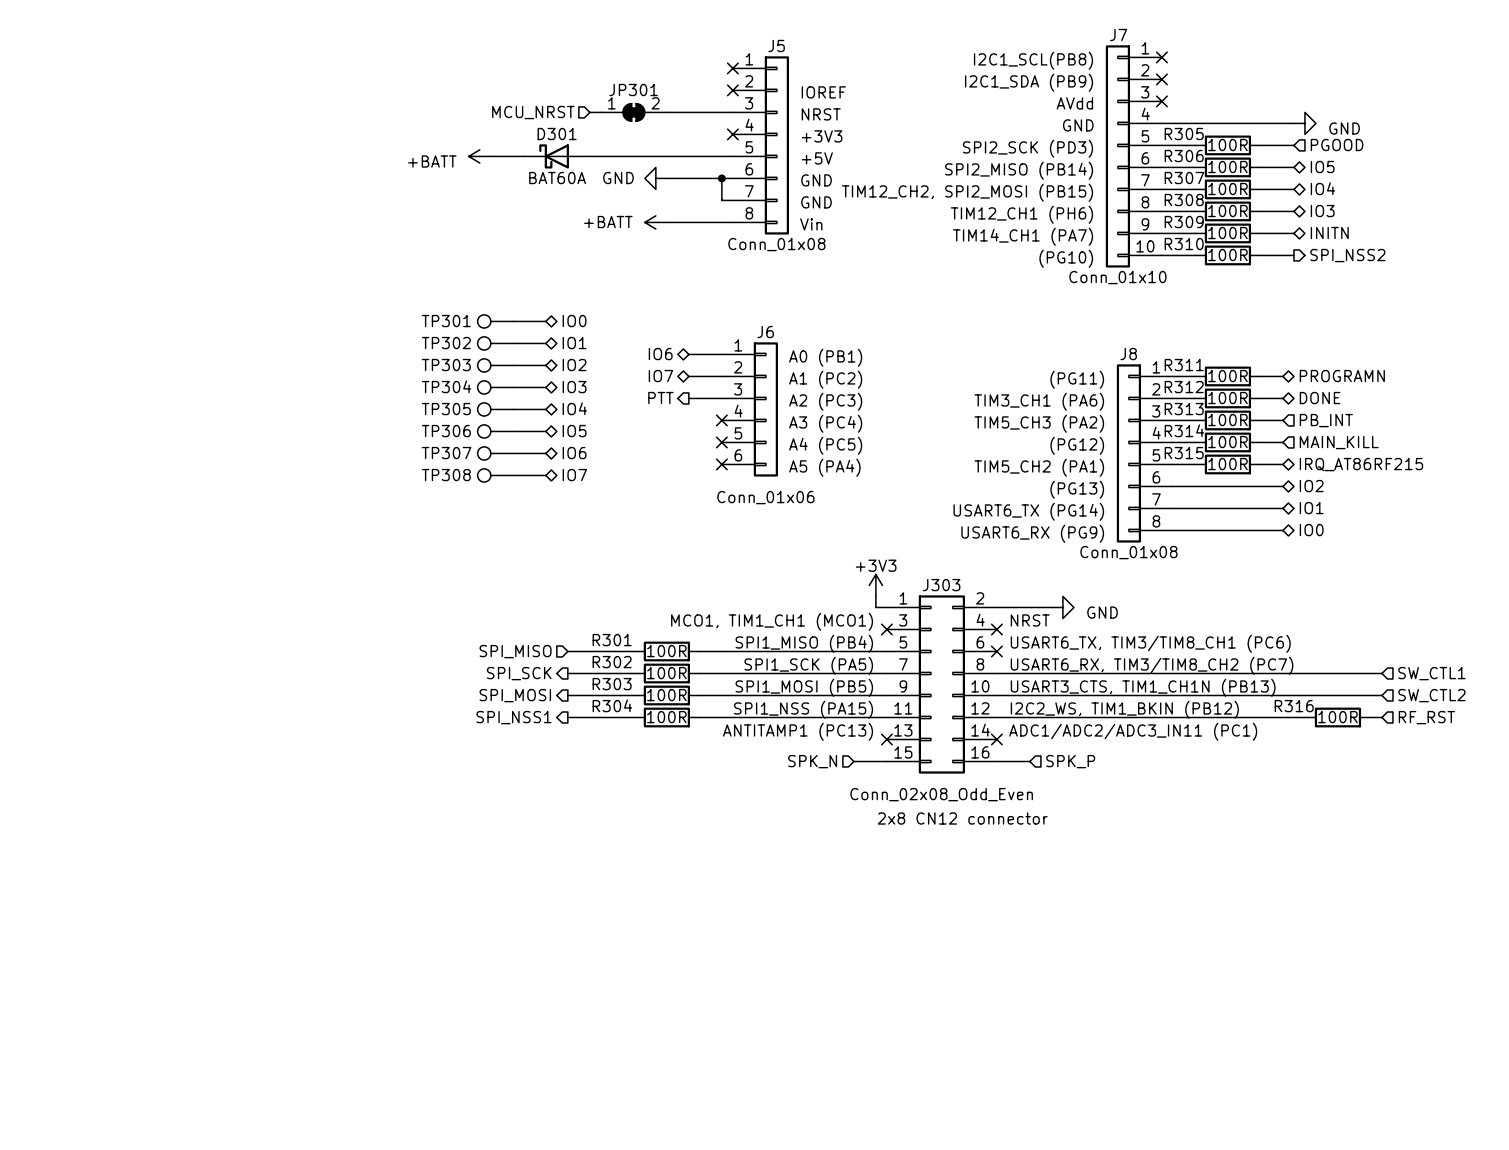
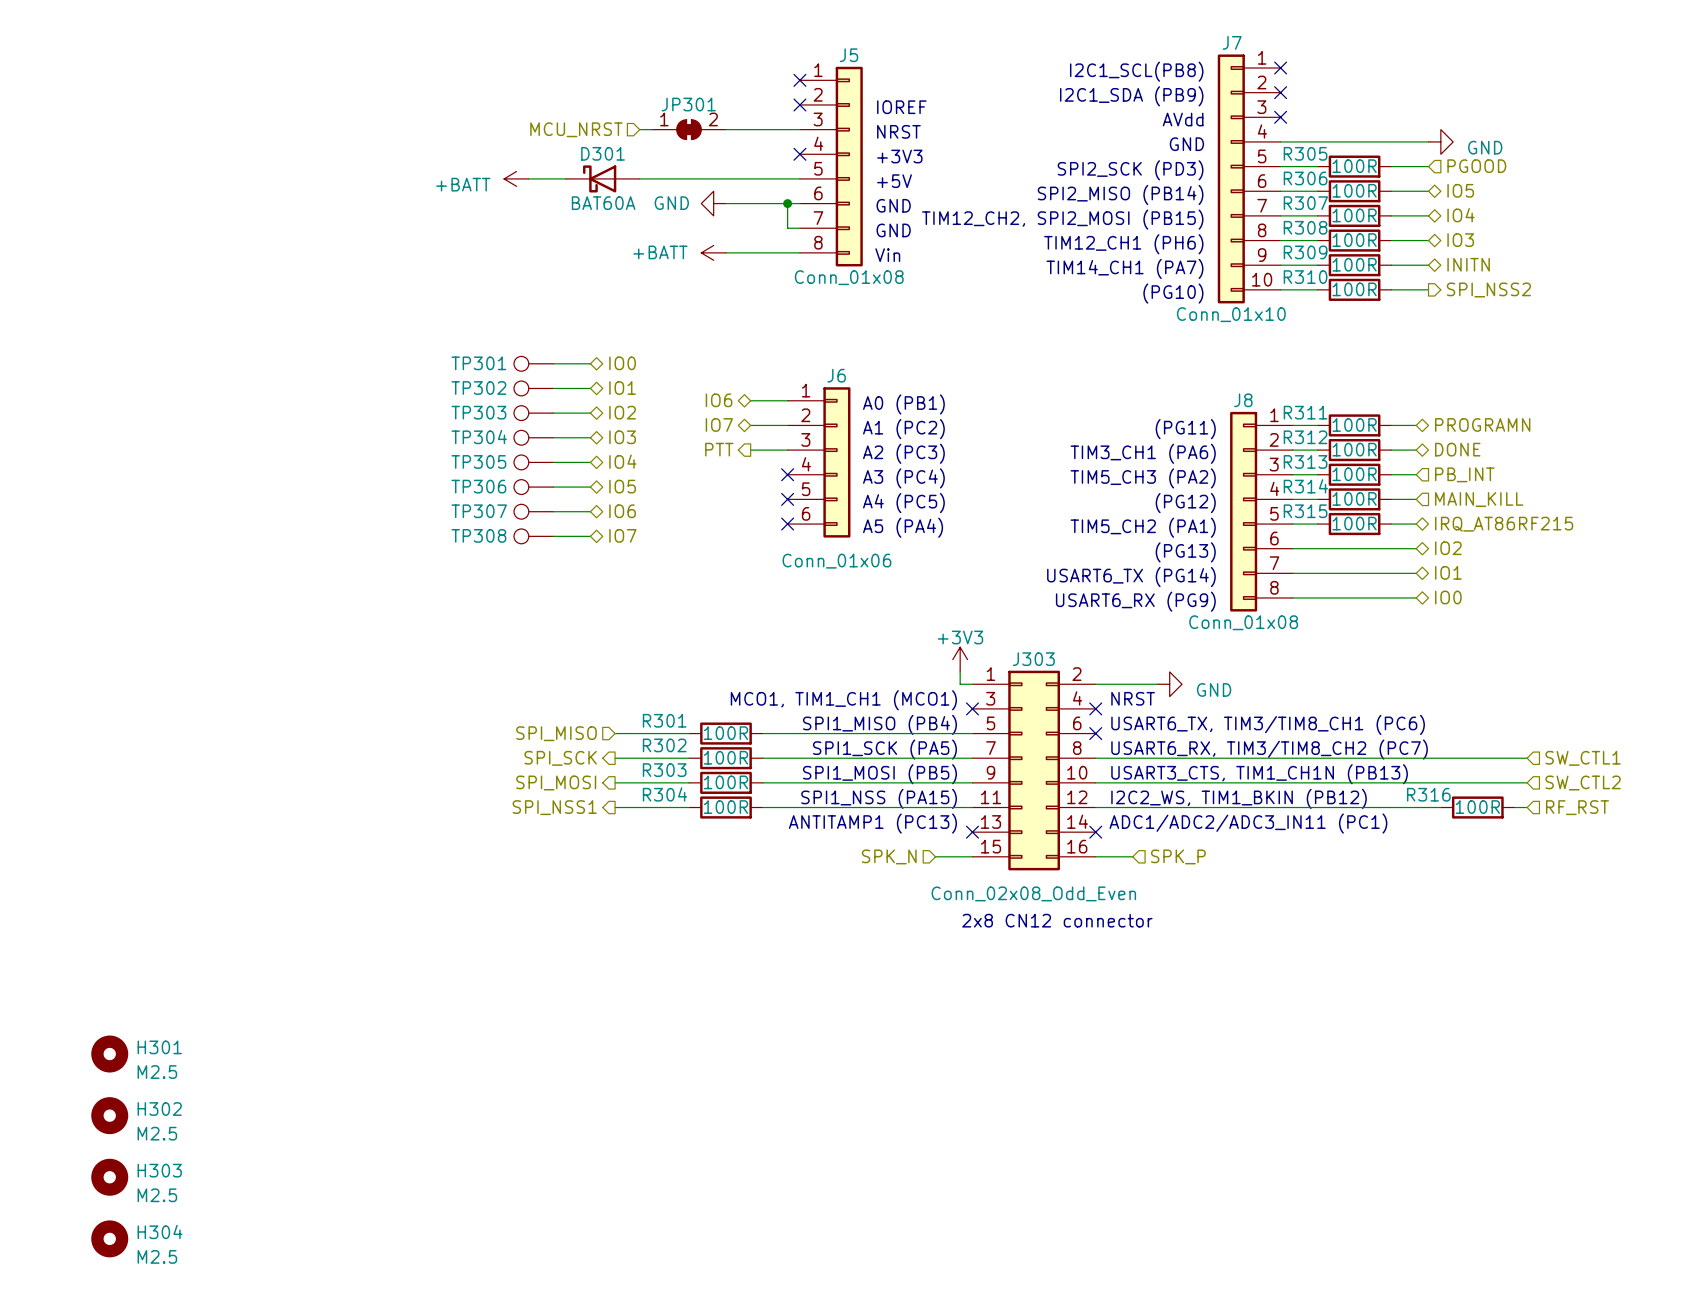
H301: none -> M2.5 (109, 1054)
H302: none -> M2.5 (109, 1115)
H303: none -> M2.5 (109, 1177)
H304: none -> M2.5 (109, 1238)

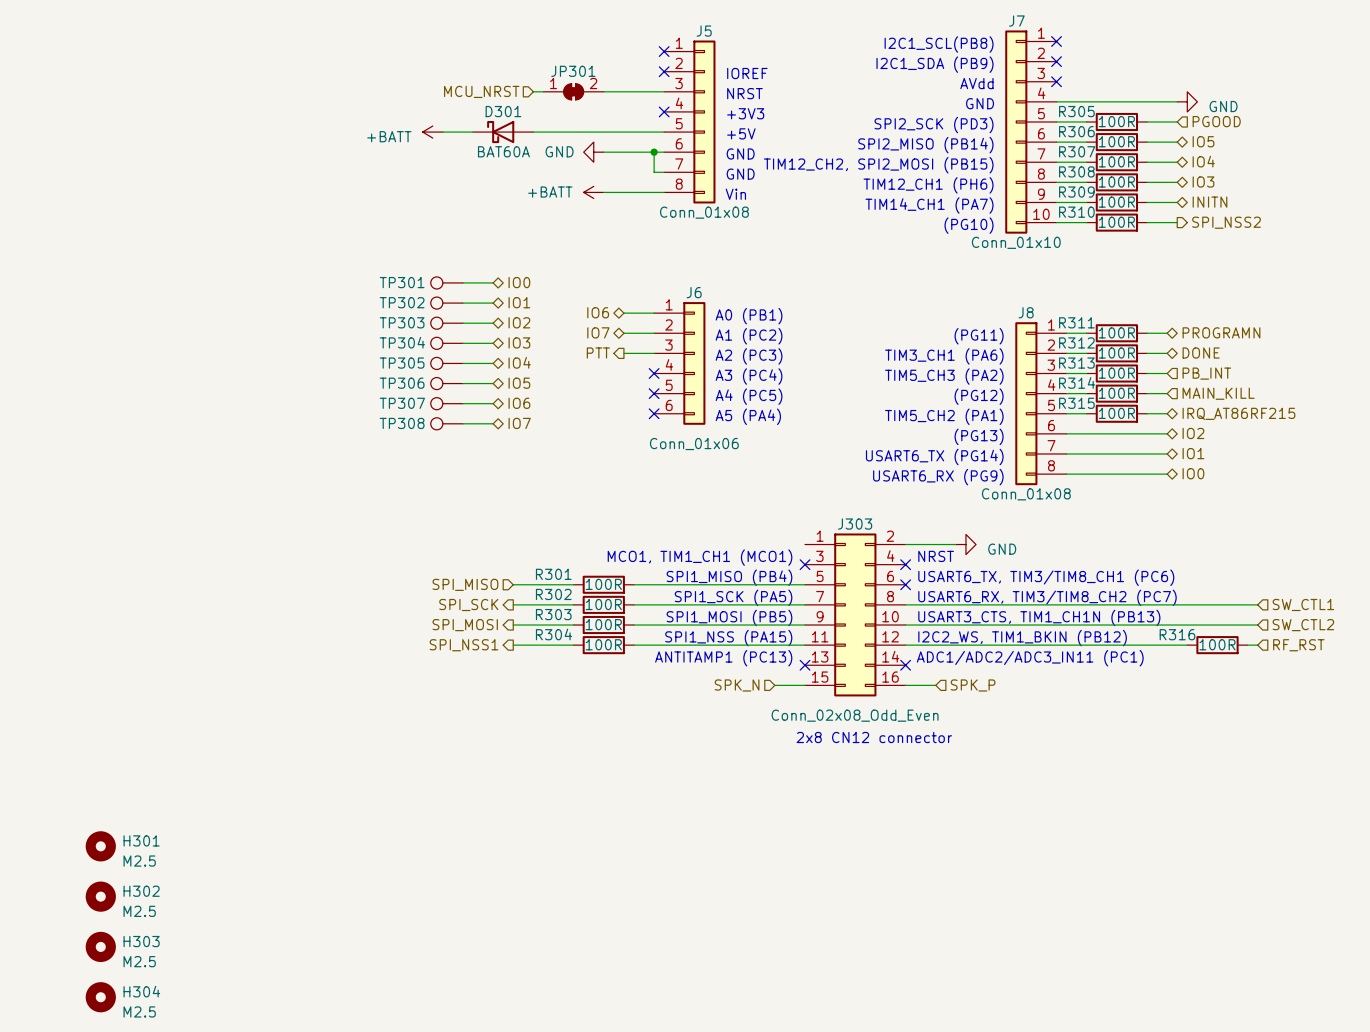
power symbol: +3V3 (960, 659) -> none
wire: (960, 671) (960, 684) (972, 684) -> none

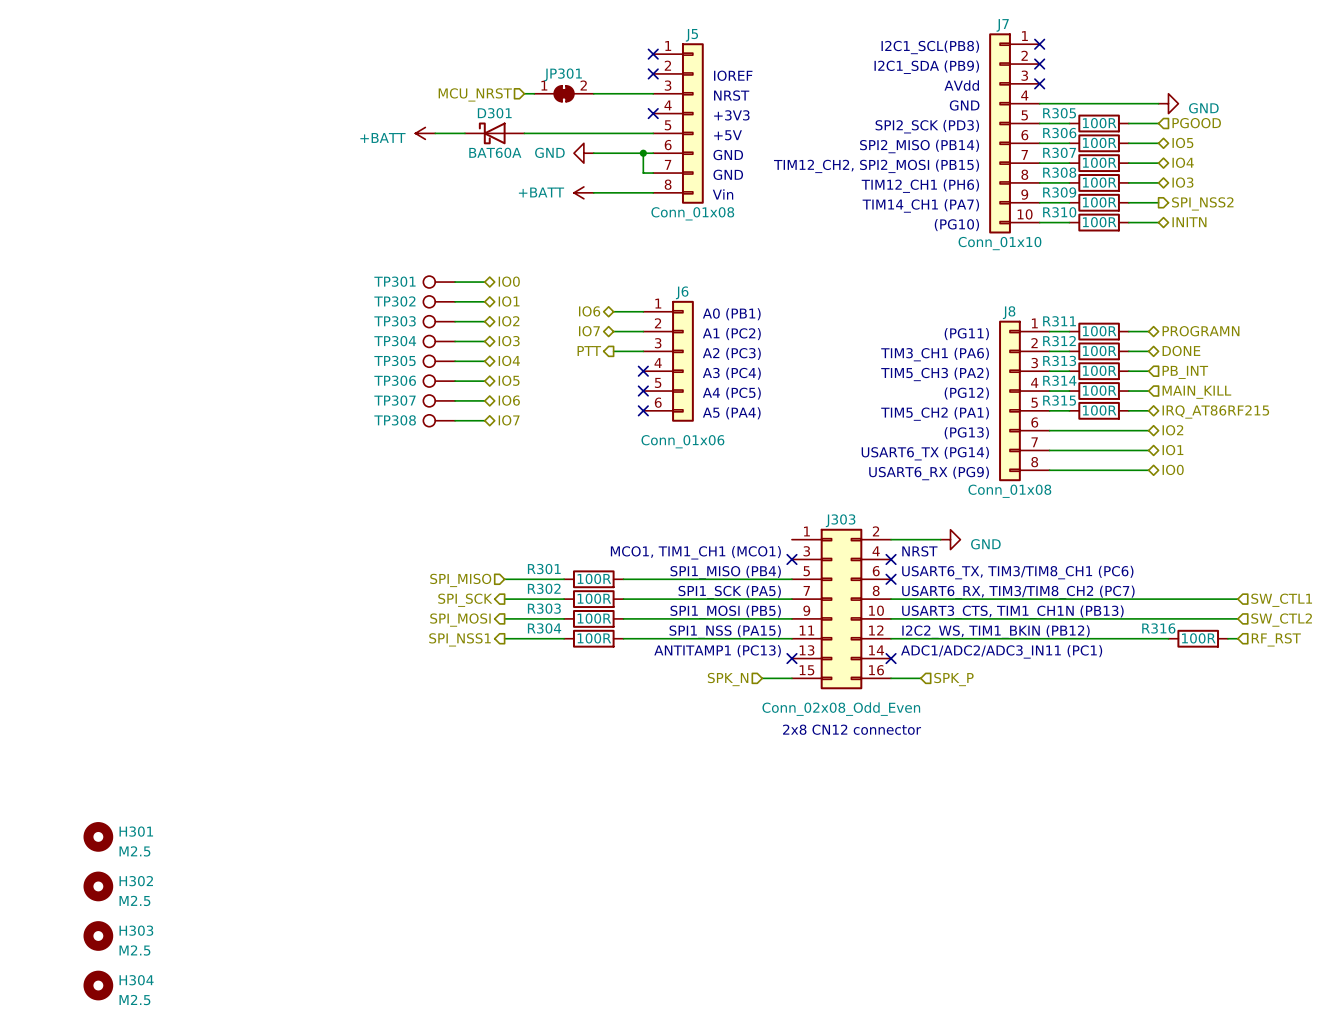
hierarchical label shape: bidirectional (1209, 202) -> output (1202, 203)
hierarchical label: INITN (1209, 202) -> SPI_NSS2 (1202, 203)
hierarchical label shape: output (1226, 222) -> bidirectional (1189, 222)
hierarchical label: SPI_NSS2 (1226, 222) -> INITN (1189, 222)

